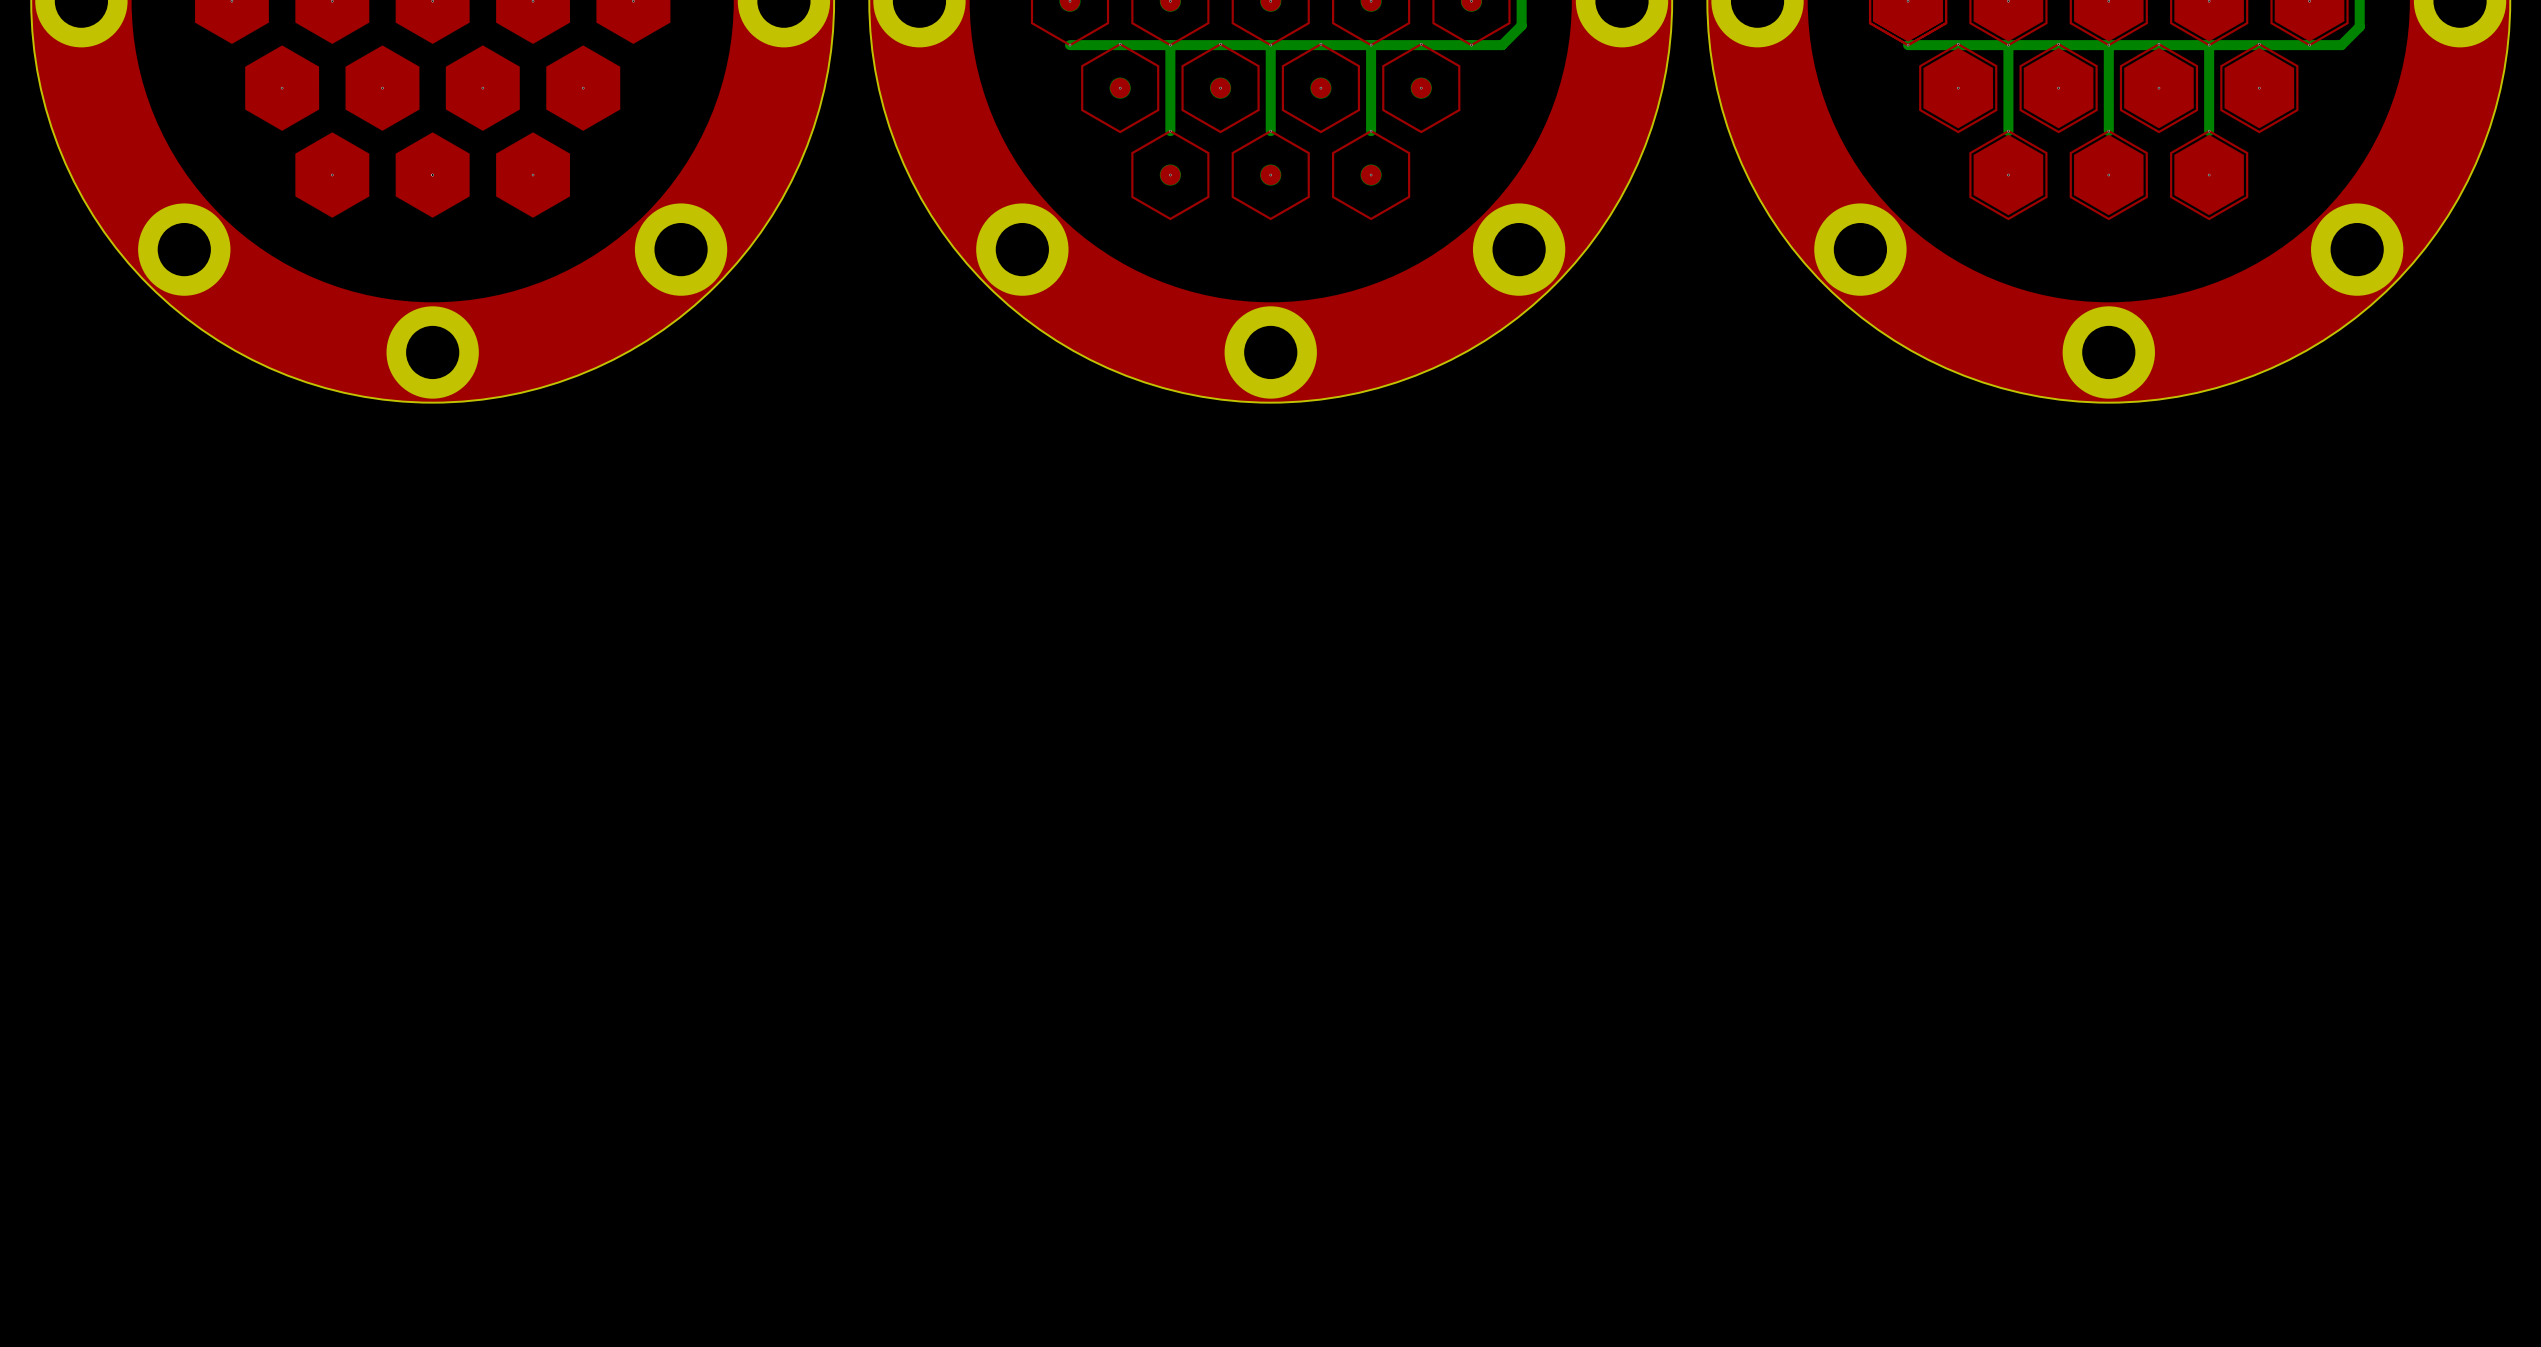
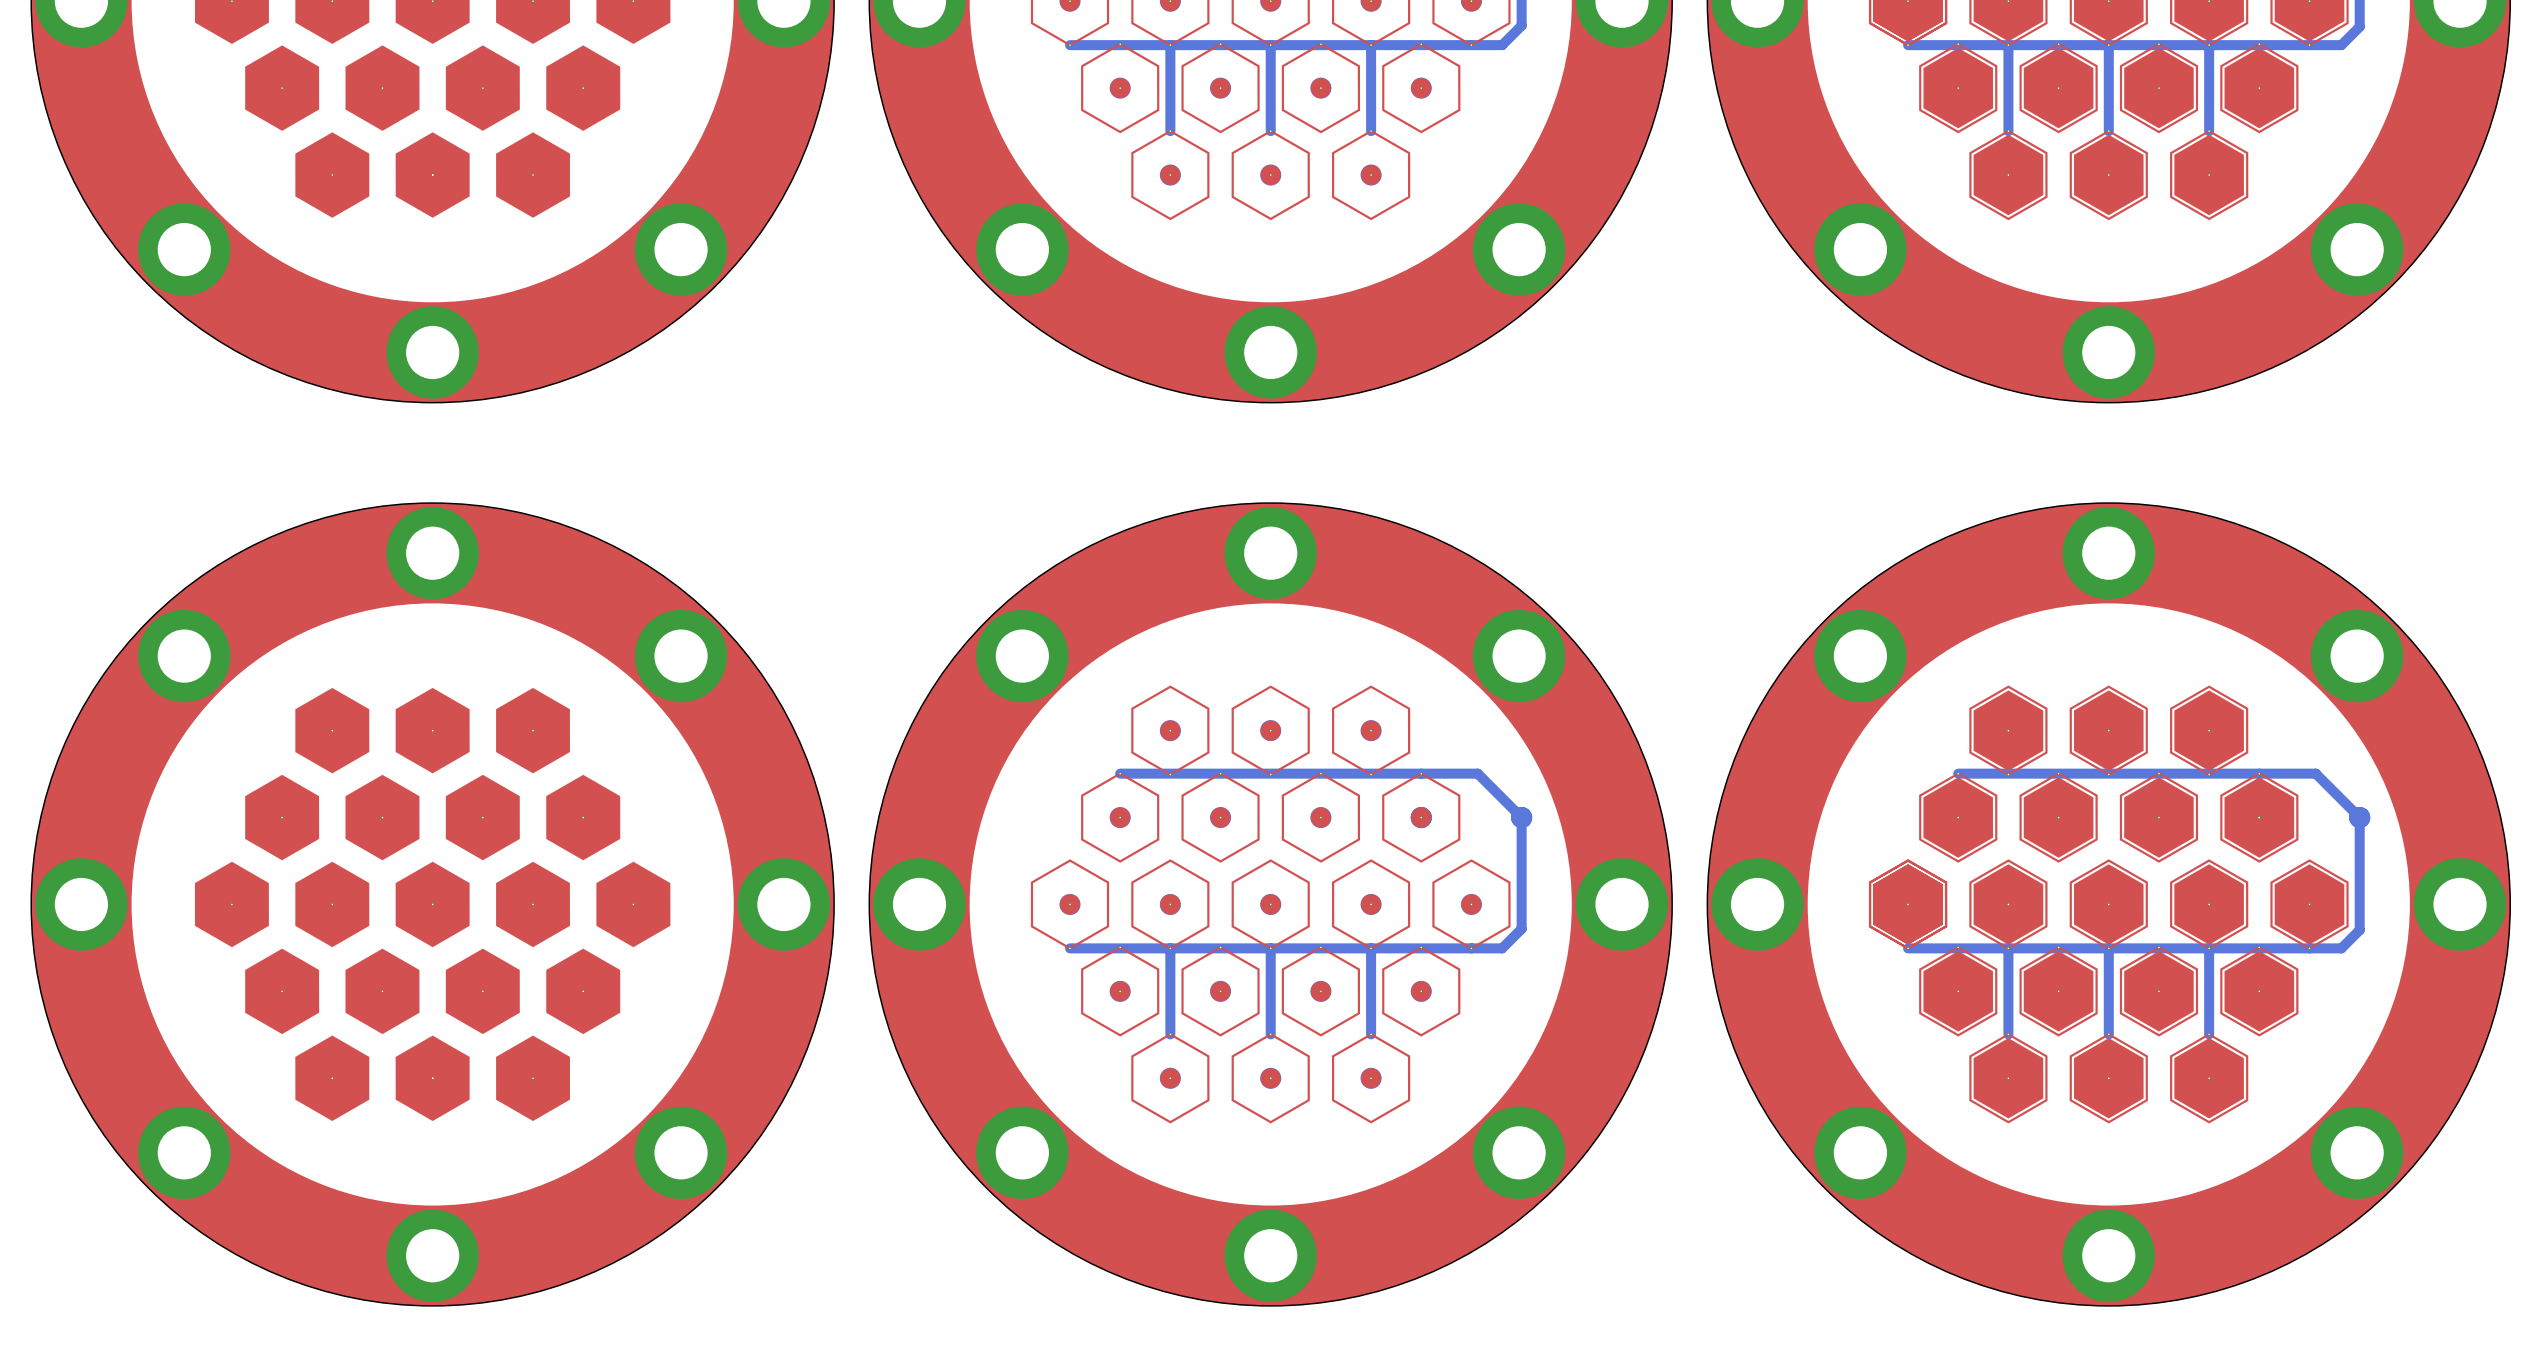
drawing: none -> [31, 503, 835, 1306]
round board edge: none -> [31, 503, 835, 1306]
drawing: none -> [869, 503, 1673, 1306]
round board edge: none -> [869, 503, 1673, 1306]
drawing: none -> [1707, 503, 2511, 1306]
round board edge: none -> [1707, 503, 2511, 1306]
part: none -> (432, 553)
part: none -> (1270, 553)
part: none -> (2108, 553)
part: none -> (184, 656)
part: none -> (681, 656)
part: none -> (1022, 656)
part: none -> (1519, 656)
part: none -> (1860, 656)
part: none -> (2357, 656)
via: none -> (332, 730)
via: none -> (432, 730)
via: none -> (533, 730)
via: none -> (1170, 730)
via: none -> (1270, 730)
via: none -> (1371, 730)
via: none -> (2008, 730)
via: none -> (2108, 730)
via: none -> (2209, 730)
bottom track: none -> (1120, 773) (1477, 773) (1521, 817) (1521, 928) (1502, 948) (1070, 948)
via: none -> (1120, 773)
via: none -> (1220, 773)
via: none -> (1320, 773)
via: none -> (1421, 773)
bottom track: none -> (1958, 773) (2315, 773) (2359, 817) (2359, 930) (2341, 948) (1908, 948)
via: none -> (1958, 773)
via: none -> (2058, 773)
via: none -> (2158, 773)
via: none -> (2259, 773)
via: none -> (1170, 774)
via: none -> (1270, 774)
via: none -> (1371, 774)
via: none -> (2008, 774)
via: none -> (2108, 774)
via: none -> (2209, 774)
via: none -> (282, 817)
via: none -> (382, 817)
via: none -> (482, 817)
via: none -> (583, 817)
via: none -> (1120, 817)
via: none -> (1220, 817)
via: none -> (1320, 817)
via: none -> (1421, 817)
via: none -> (1958, 817)
via: none -> (2058, 817)
via: none -> (2158, 817)
via: none -> (2259, 817)
part: none -> (81, 904)
via: none -> (231, 904)
via: none -> (332, 904)
via: none -> (432, 904)
via: none -> (533, 904)
via: none -> (633, 904)
part: none -> (783, 904)
part: none -> (919, 904)
via: none -> (1070, 904)
via: none -> (1170, 904)
via: none -> (1270, 904)
via: none -> (1371, 904)
via: none -> (1471, 904)
part: none -> (1621, 904)
part: none -> (1757, 904)
via: none -> (1908, 904)
via: none -> (2008, 904)
via: none -> (2108, 904)
via: none -> (2209, 904)
via: none -> (2309, 904)
part: none -> (2460, 904)
via: none -> (1120, 947)
via: none -> (1220, 947)
via: none -> (1320, 947)
via: none -> (1421, 947)
via: none -> (1958, 947)
via: none -> (2058, 947)
via: none -> (2158, 947)
via: none -> (2259, 947)
via: none -> (1070, 948)
bottom track: none -> (1170, 948) (1170, 1034)
via: none -> (1170, 948)
bottom track: none -> (1270, 948) (1270, 1034)
via: none -> (1270, 948)
bottom track: none -> (1371, 948) (1371, 1034)
via: none -> (1371, 948)
via: none -> (1471, 948)
via: none -> (1908, 948)
bottom track: none -> (2008, 948) (2008, 1034)
via: none -> (2008, 948)
bottom track: none -> (2108, 948) (2108, 1034)
via: none -> (2108, 948)
bottom track: none -> (2209, 948) (2209, 1034)
via: none -> (2209, 948)
via: none -> (2309, 948)
via: none -> (282, 991)
via: none -> (382, 991)
via: none -> (482, 991)
via: none -> (583, 991)
via: none -> (1120, 991)
via: none -> (1220, 991)
via: none -> (1320, 991)
via: none -> (1421, 991)
via: none -> (1958, 991)
via: none -> (2058, 991)
via: none -> (2158, 991)
via: none -> (2259, 991)
via: none -> (1170, 1034)
via: none -> (1270, 1034)
via: none -> (1371, 1034)
via: none -> (2008, 1034)
via: none -> (2108, 1034)
via: none -> (2209, 1034)
via: none -> (332, 1078)
via: none -> (432, 1078)
via: none -> (533, 1078)
via: none -> (1170, 1078)
via: none -> (1270, 1078)
via: none -> (1371, 1078)
via: none -> (2008, 1078)
via: none -> (2108, 1078)
via: none -> (2209, 1078)
part: none -> (184, 1152)
part: none -> (681, 1152)
part: none -> (1022, 1152)
part: none -> (1519, 1152)
part: none -> (1860, 1152)
part: none -> (2357, 1152)
part: none -> (432, 1255)
part: none -> (1270, 1255)
part: none -> (2108, 1255)

